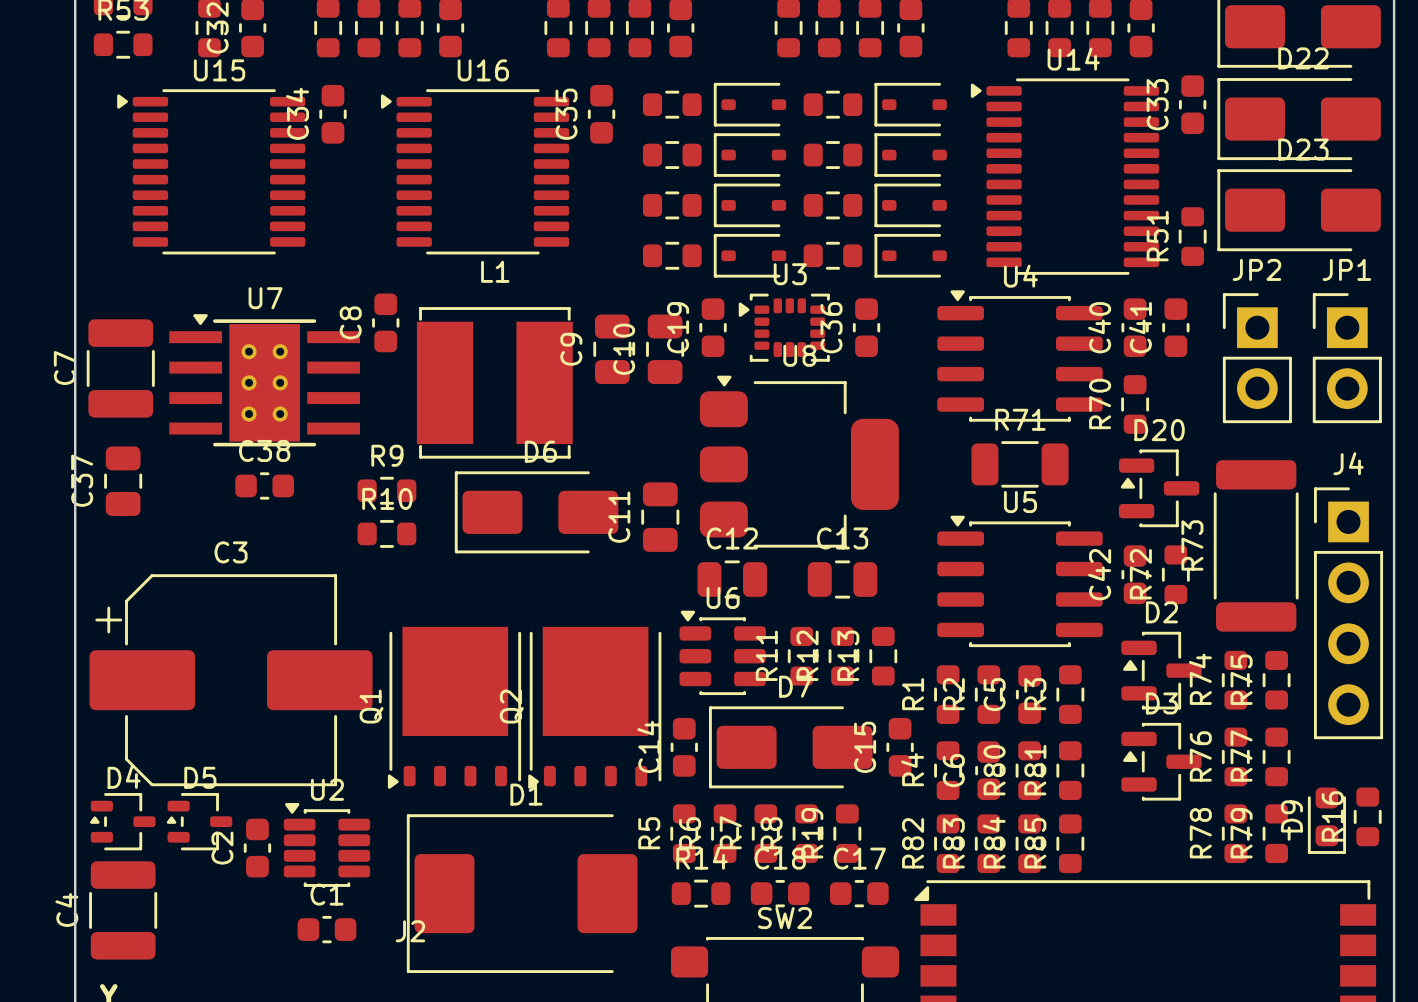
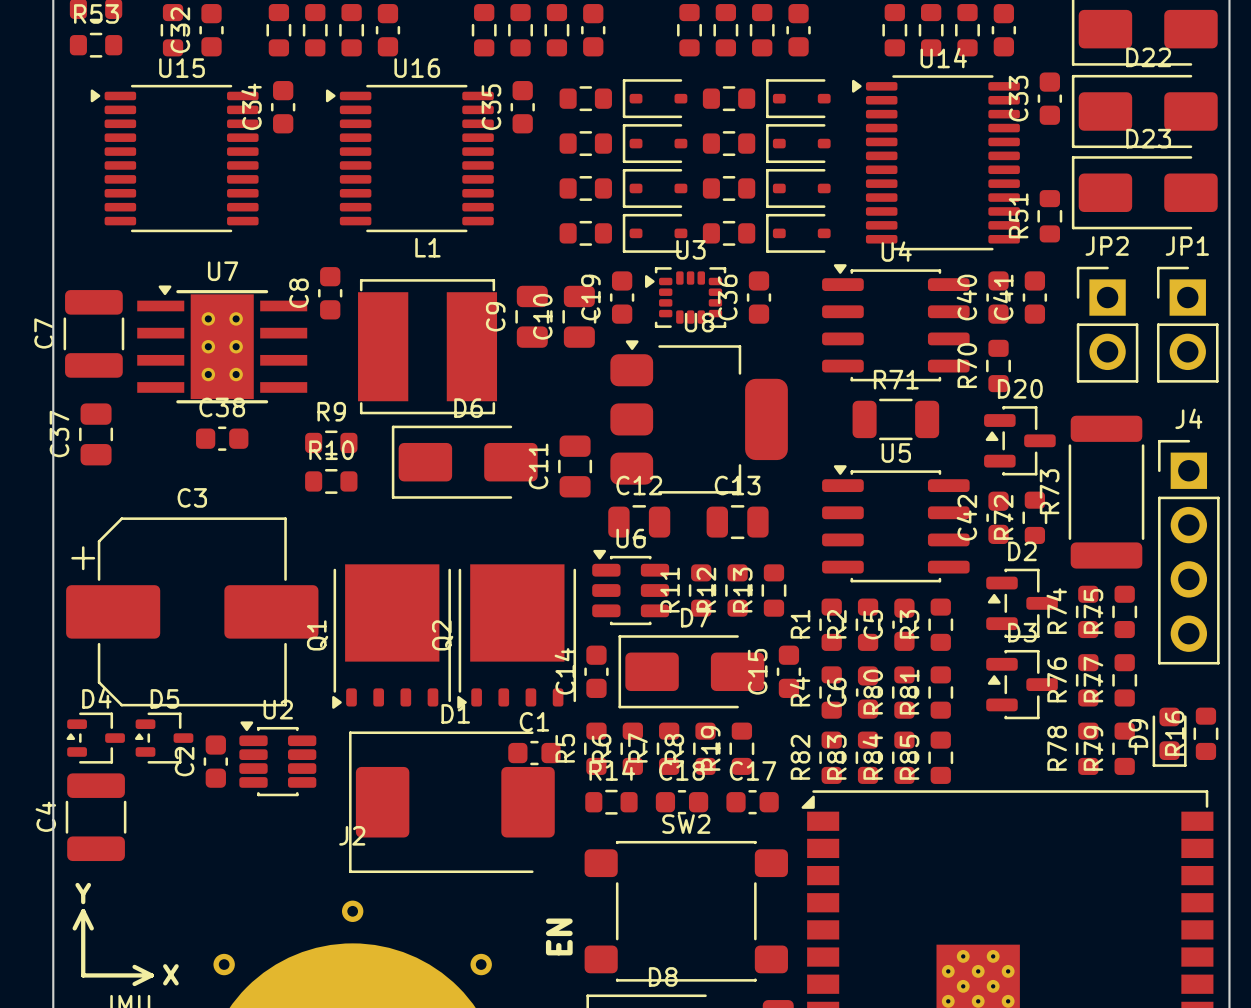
C1 position: (326, 929) -> (534, 753)

